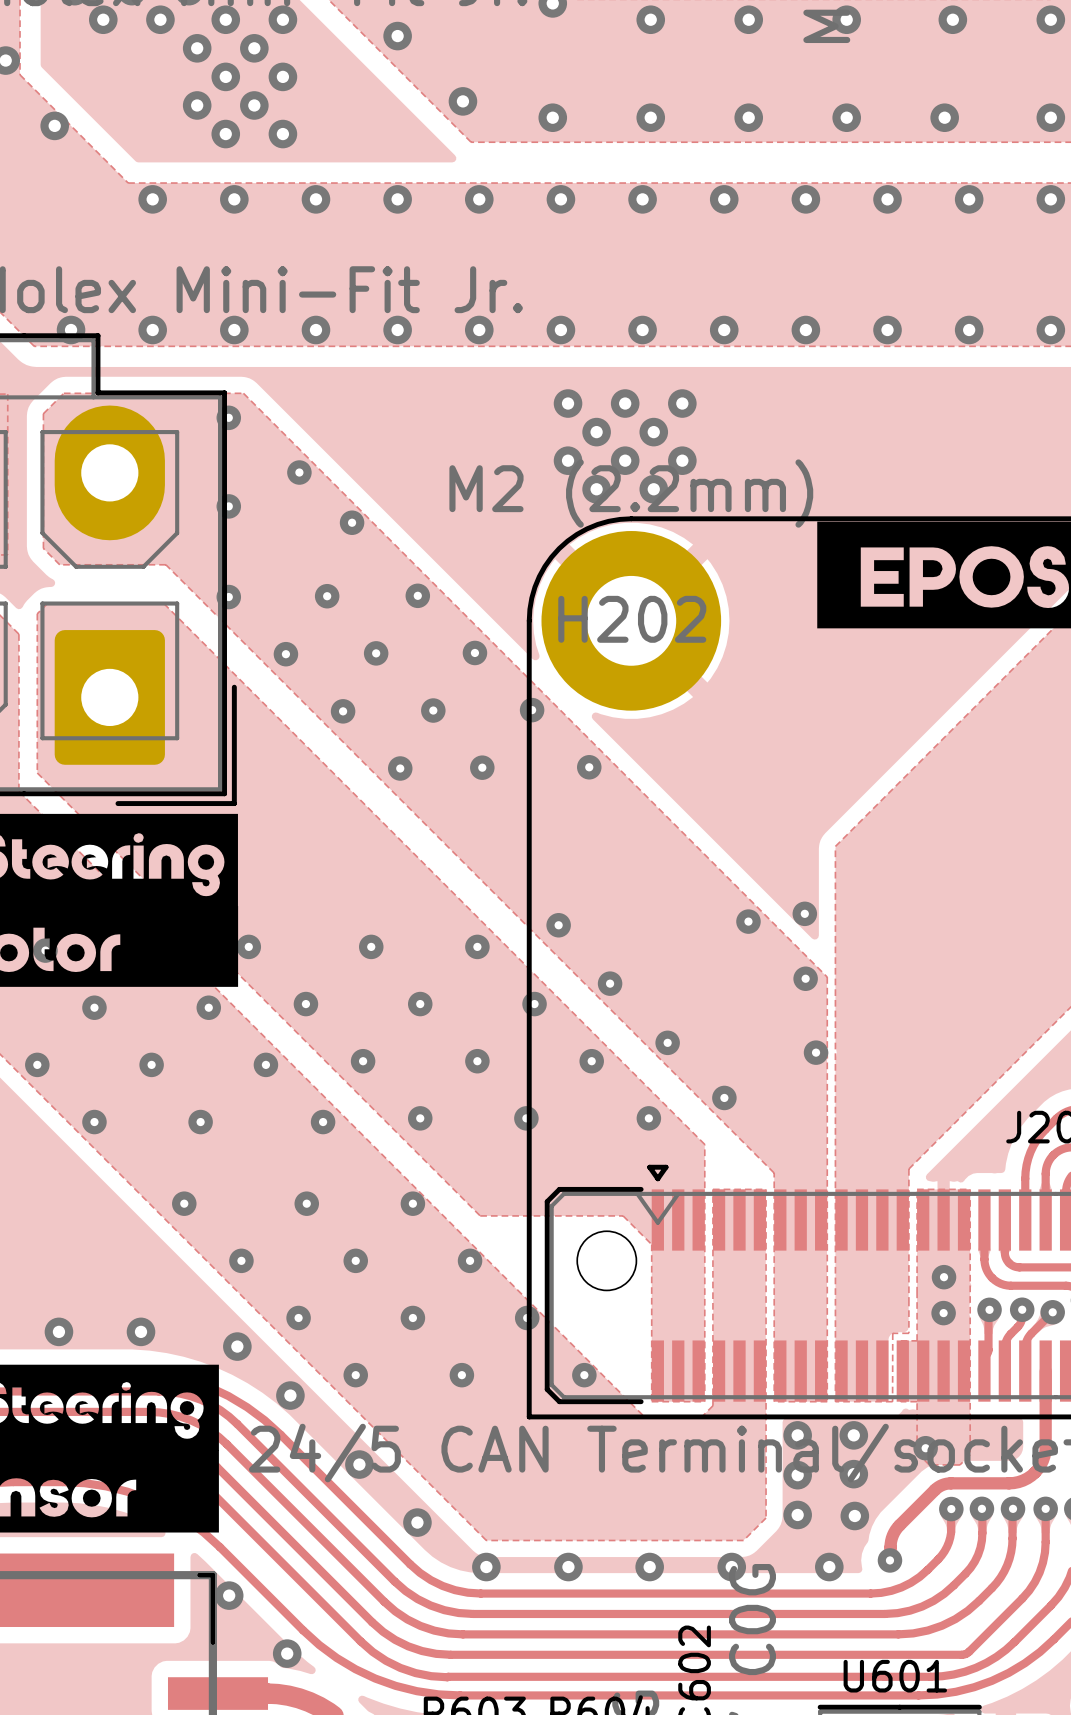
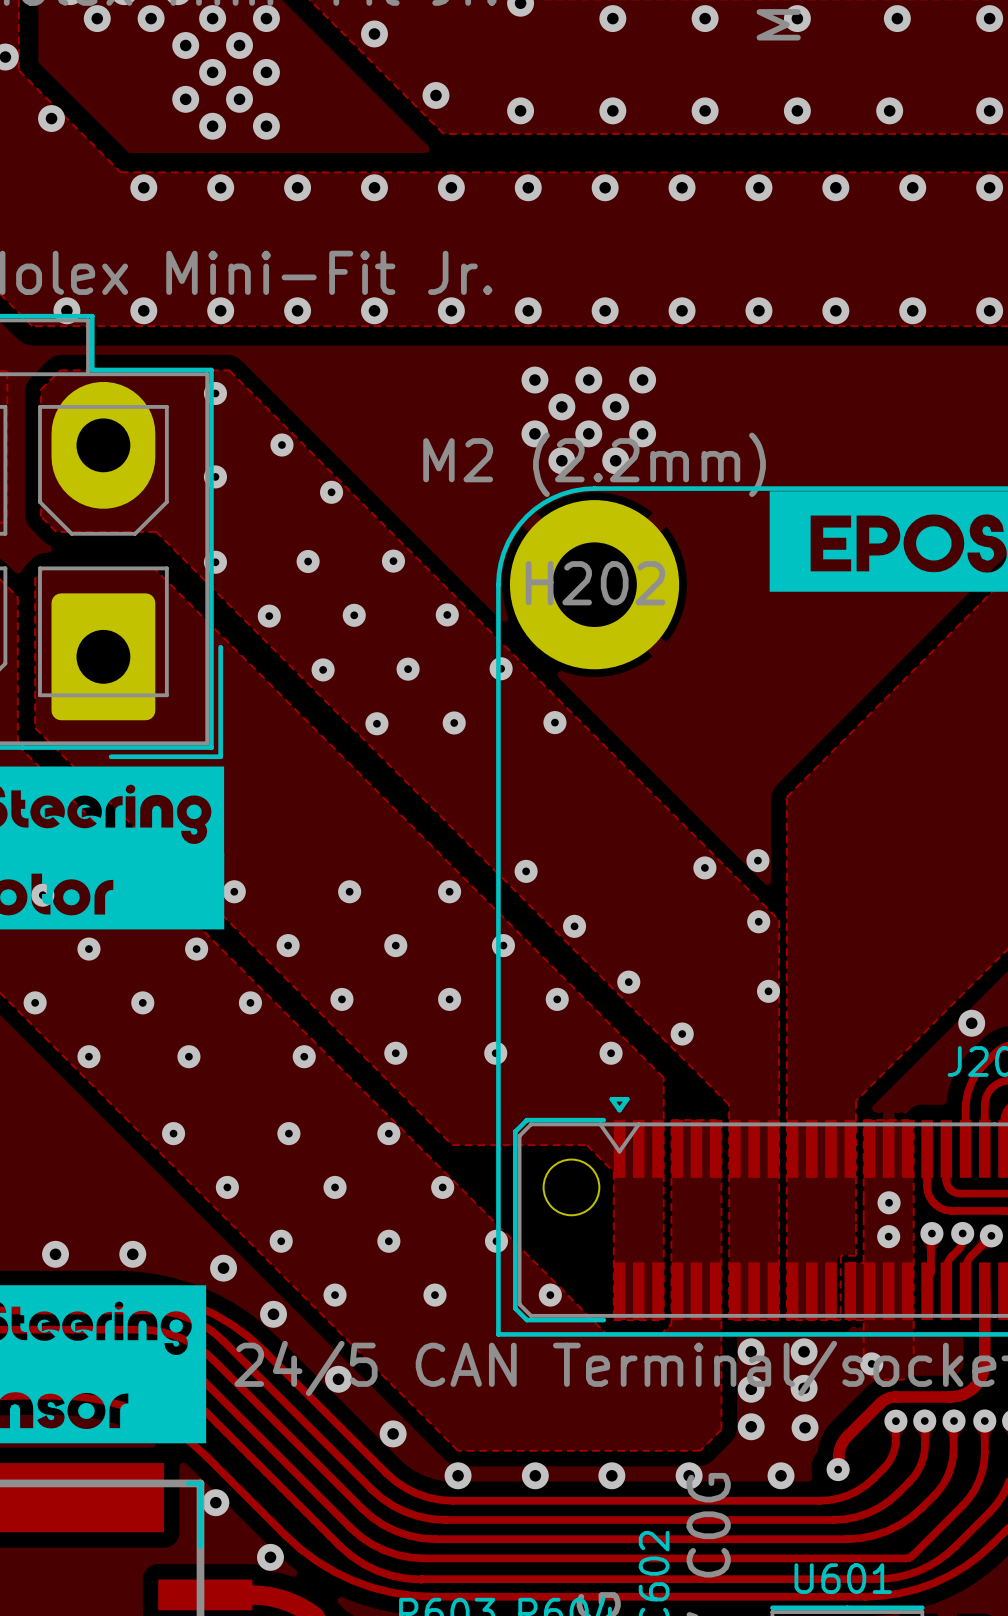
via: none -> (971, 1023)

